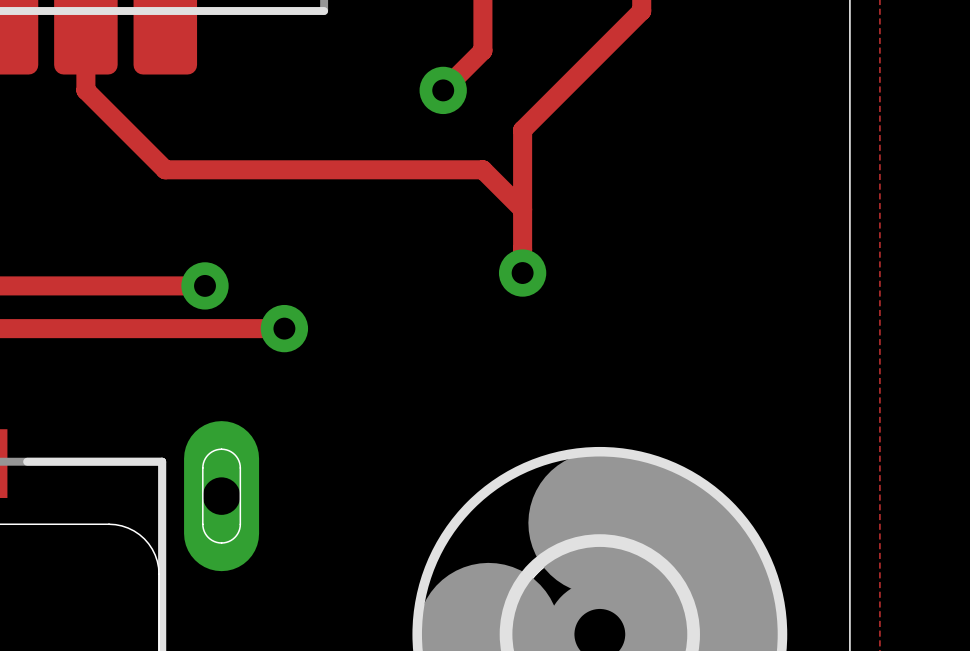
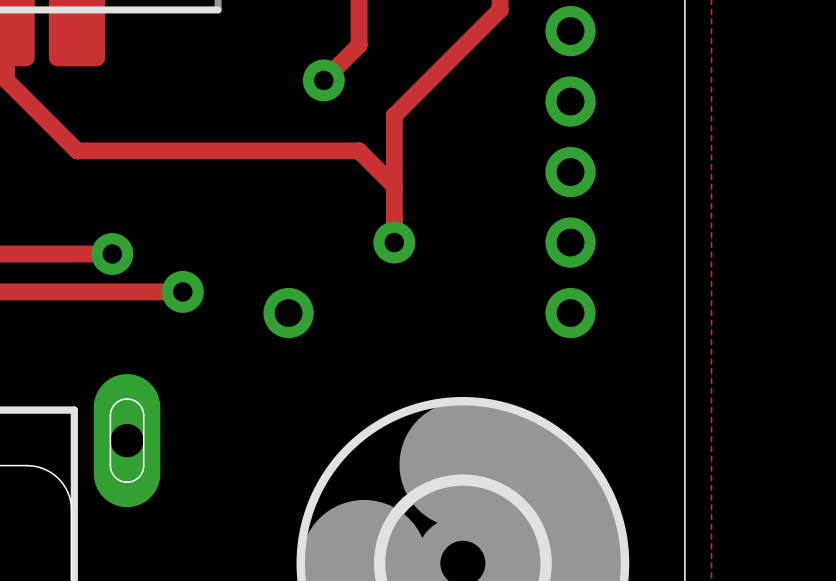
via: none -> (570, 31)
via: none -> (570, 101)
via: none -> (570, 172)
via: none -> (570, 242)
via: none -> (288, 313)
via: none -> (570, 313)

